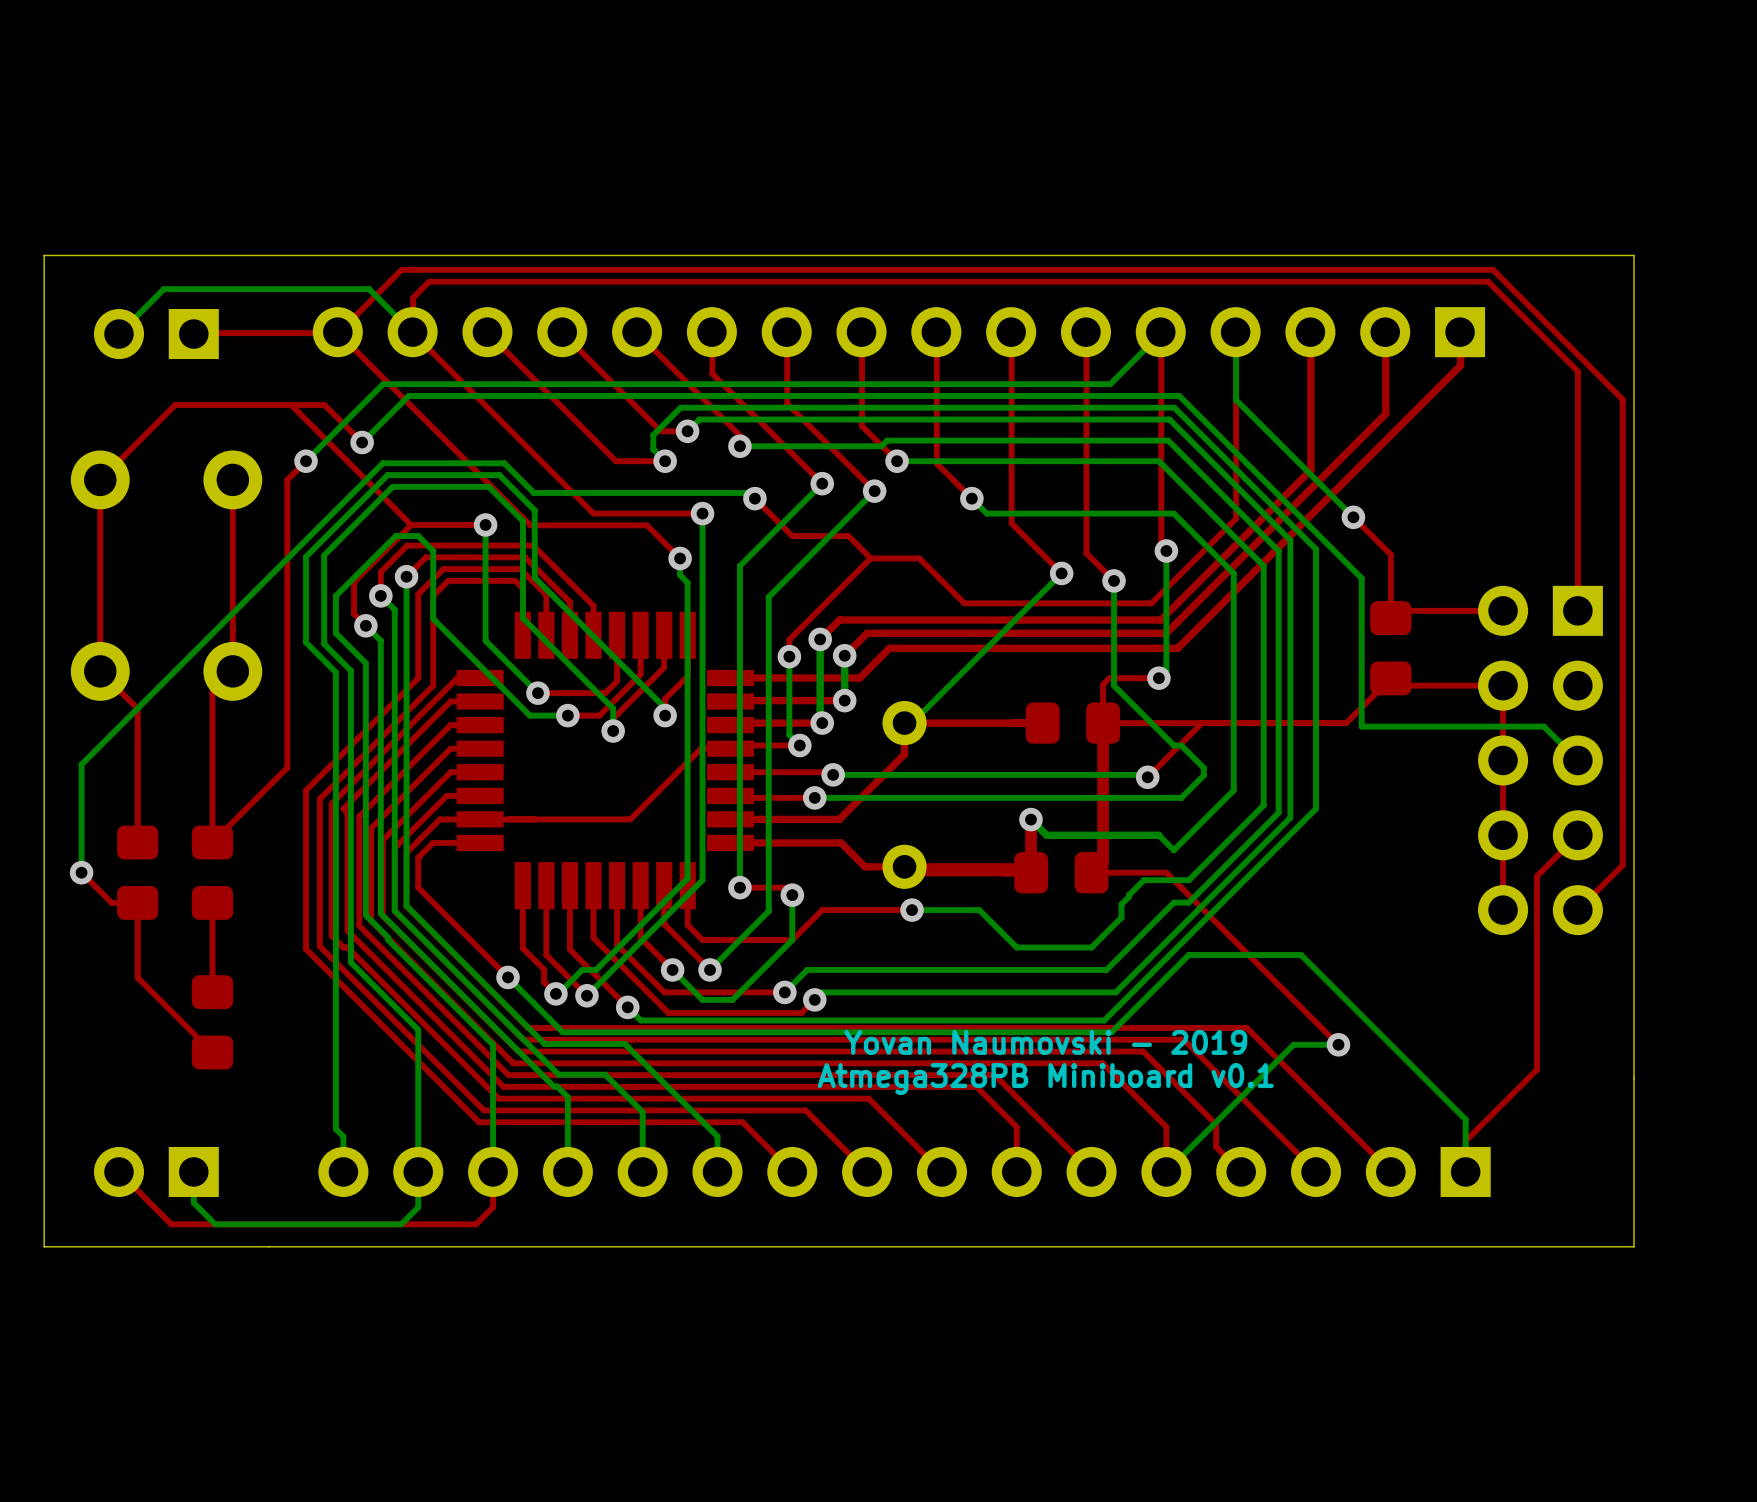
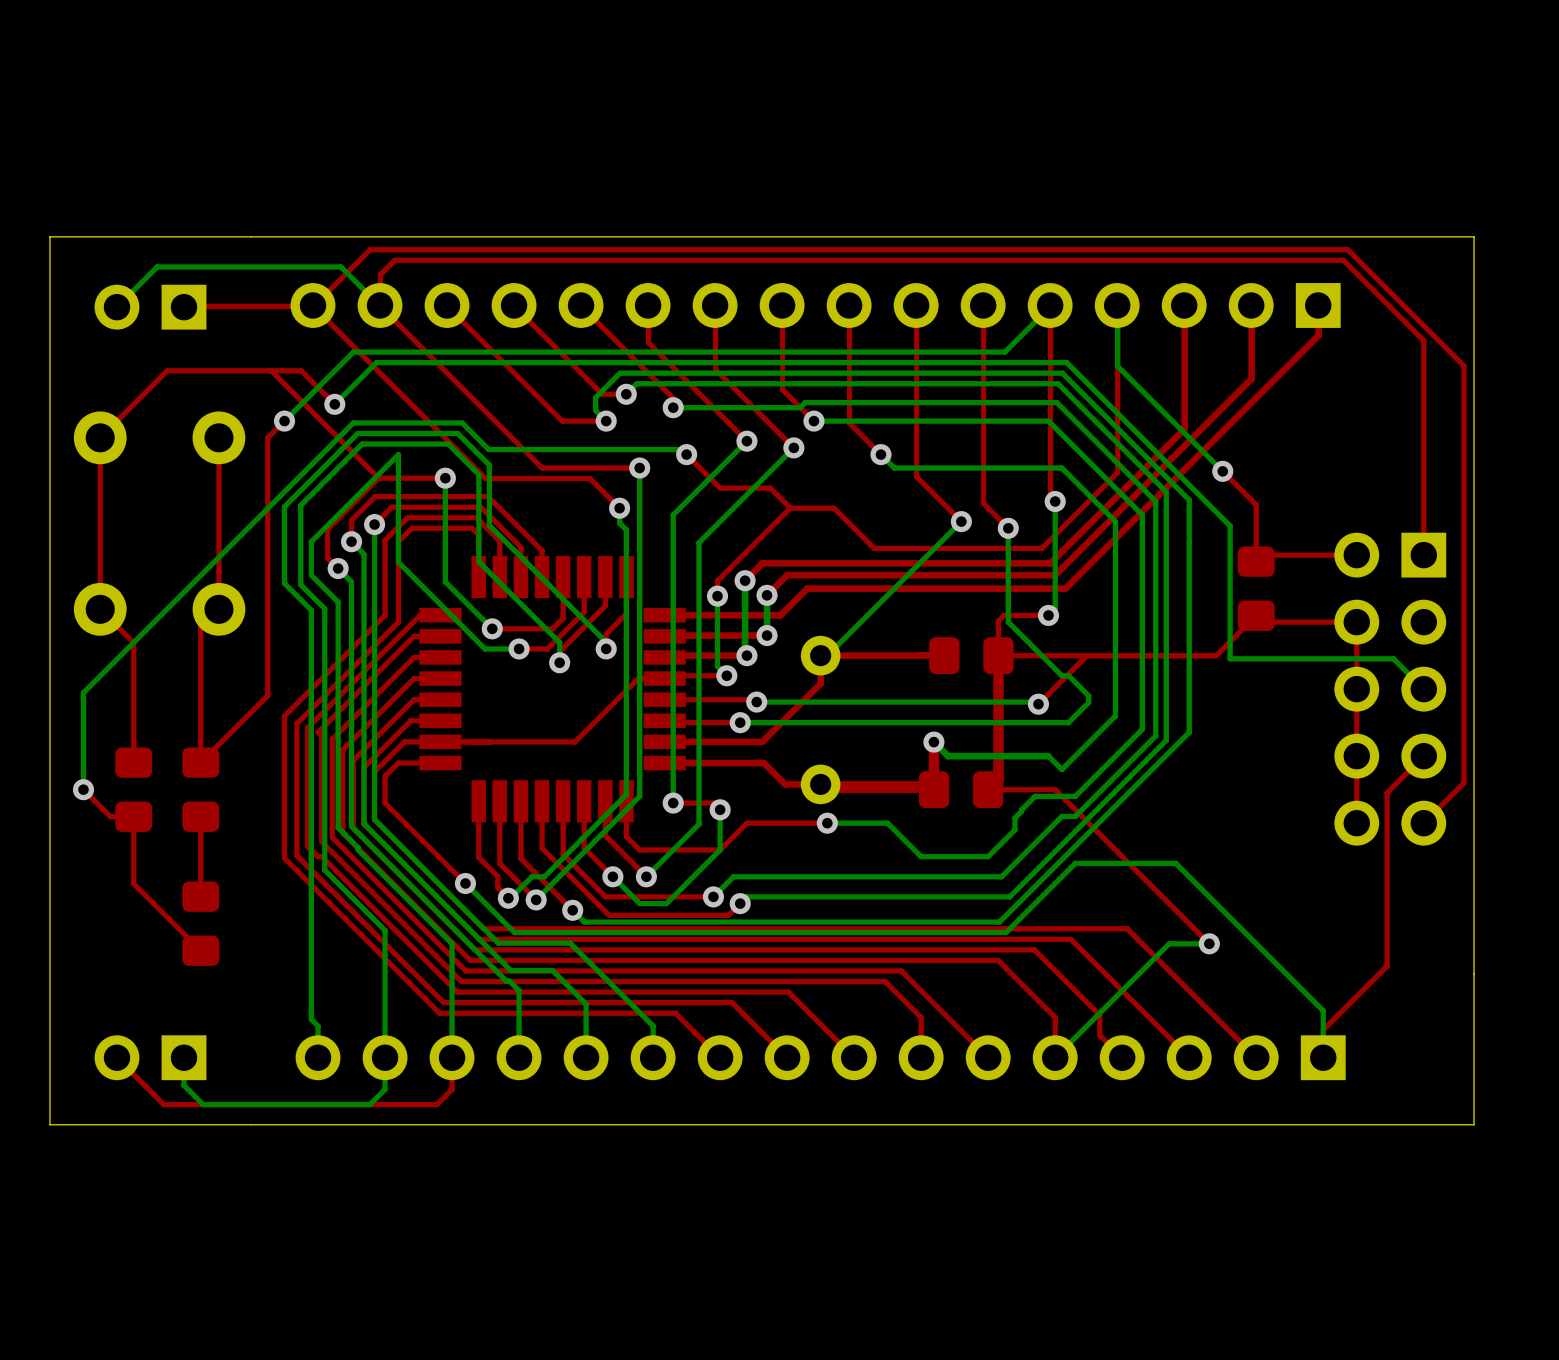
bottom track: (395, 536) (418, 536) (433, 551) -> (364, 488) (398, 454) (398, 501)
text: Yovan Naumovski - 2019 (1045, 1042) -> none
text: Atmega328PB Miniboard v0.1 (1045, 1079) -> none

